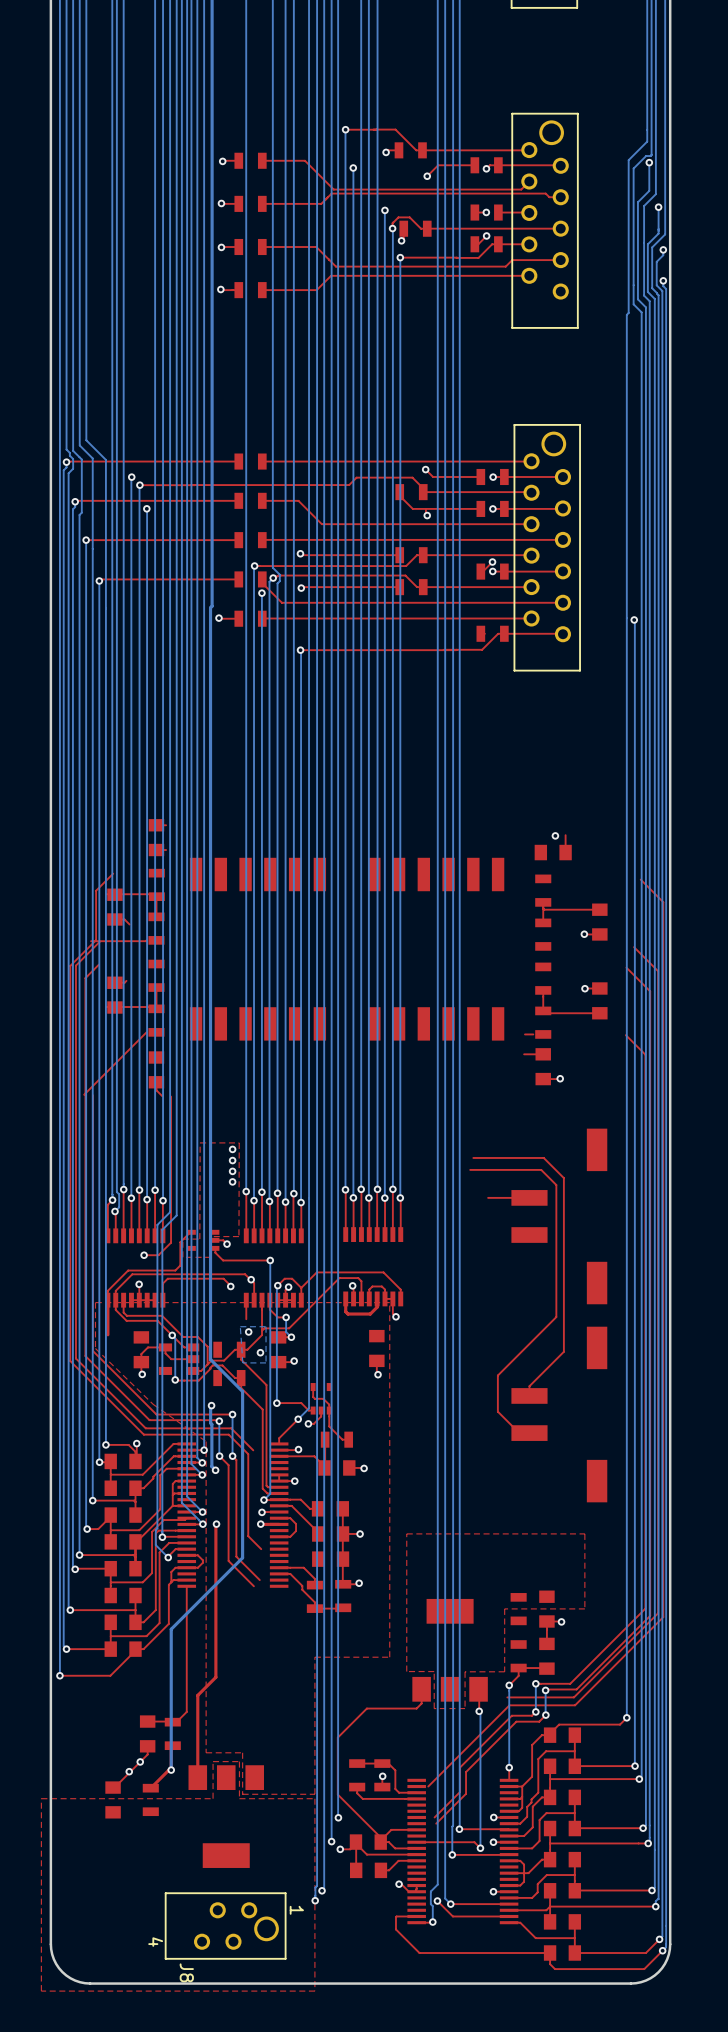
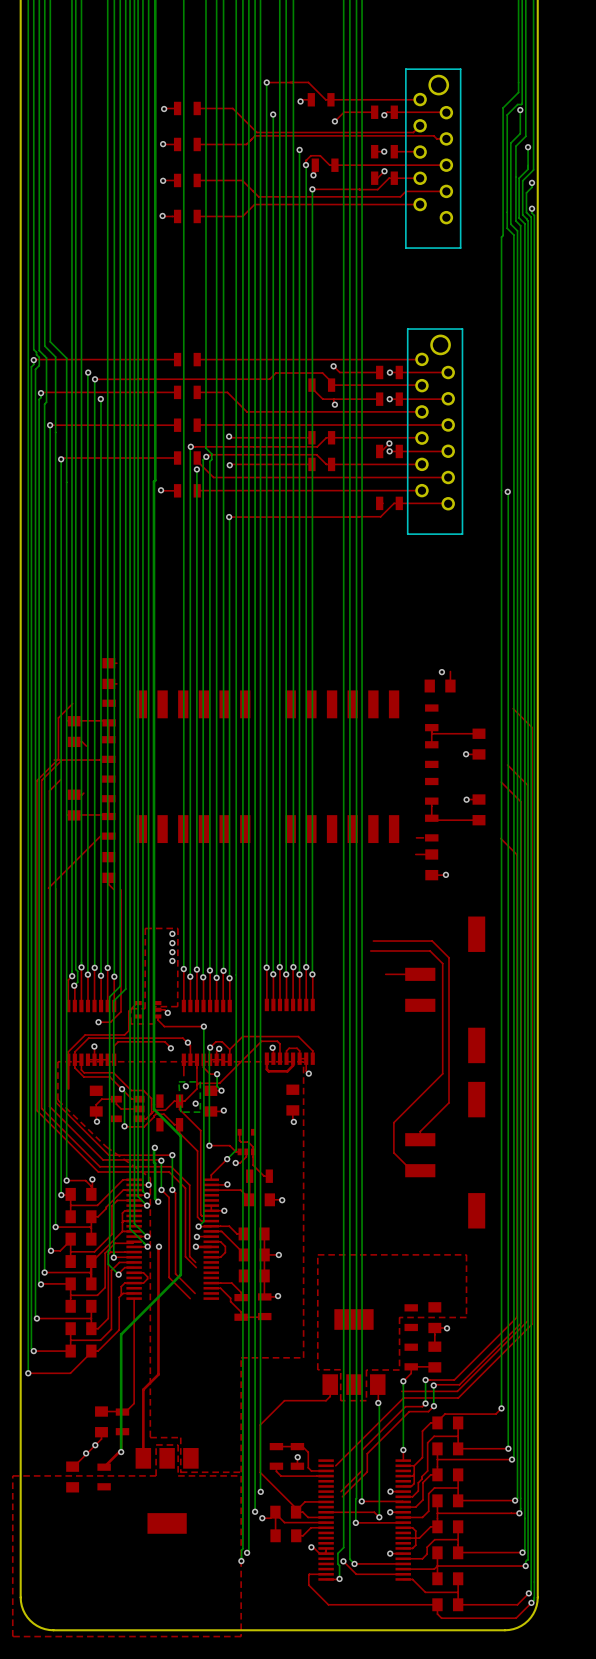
top track: none -> (189, 1185) (189, 1256) (195, 1262)
J8: (225, 1926) -> none

